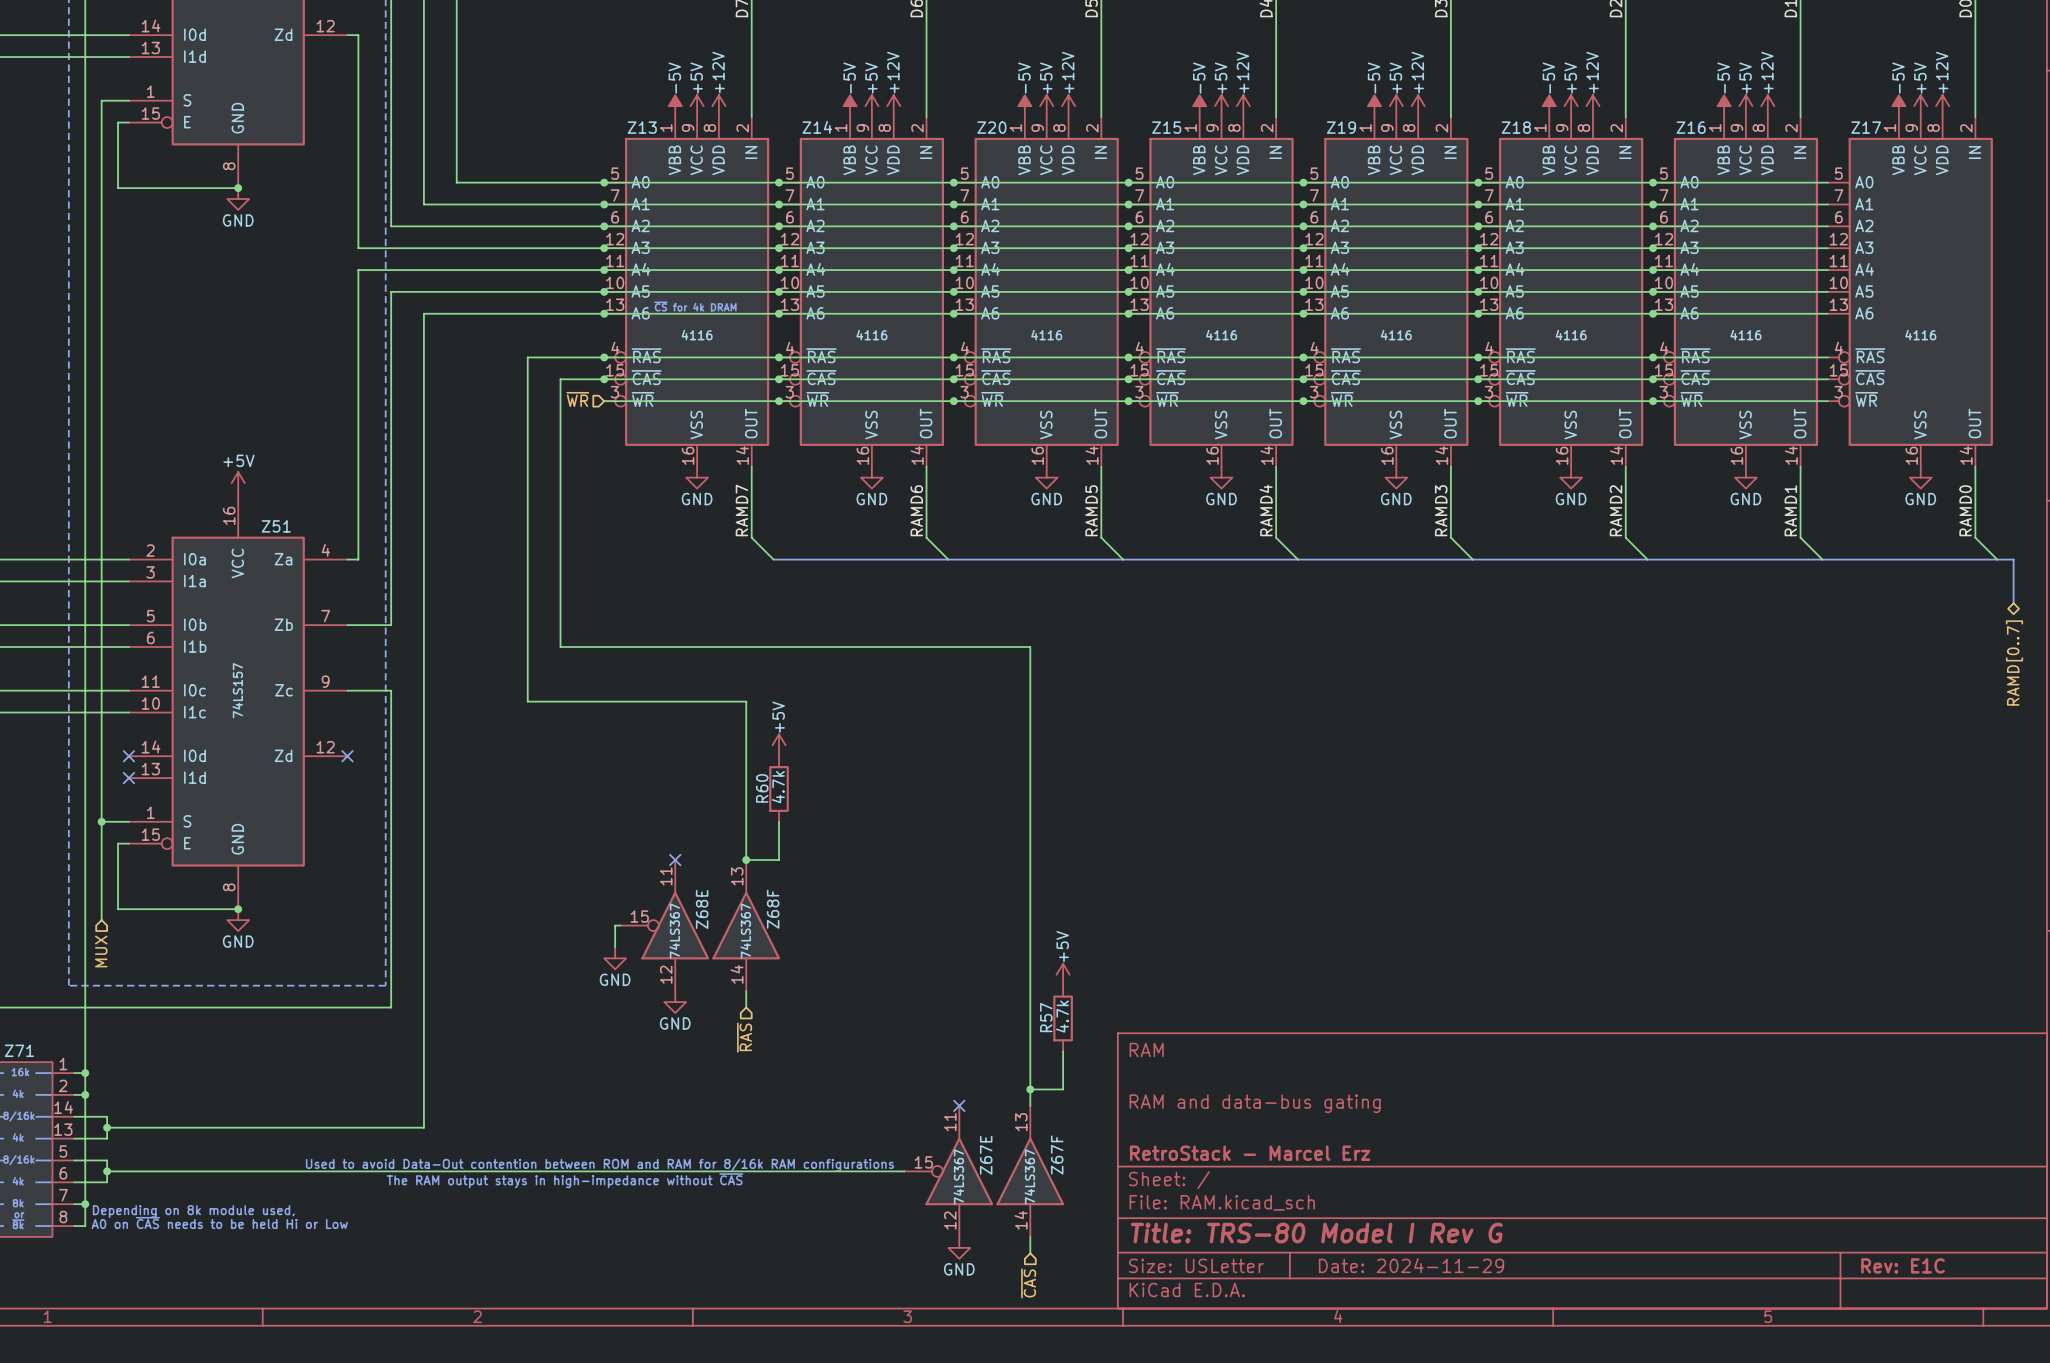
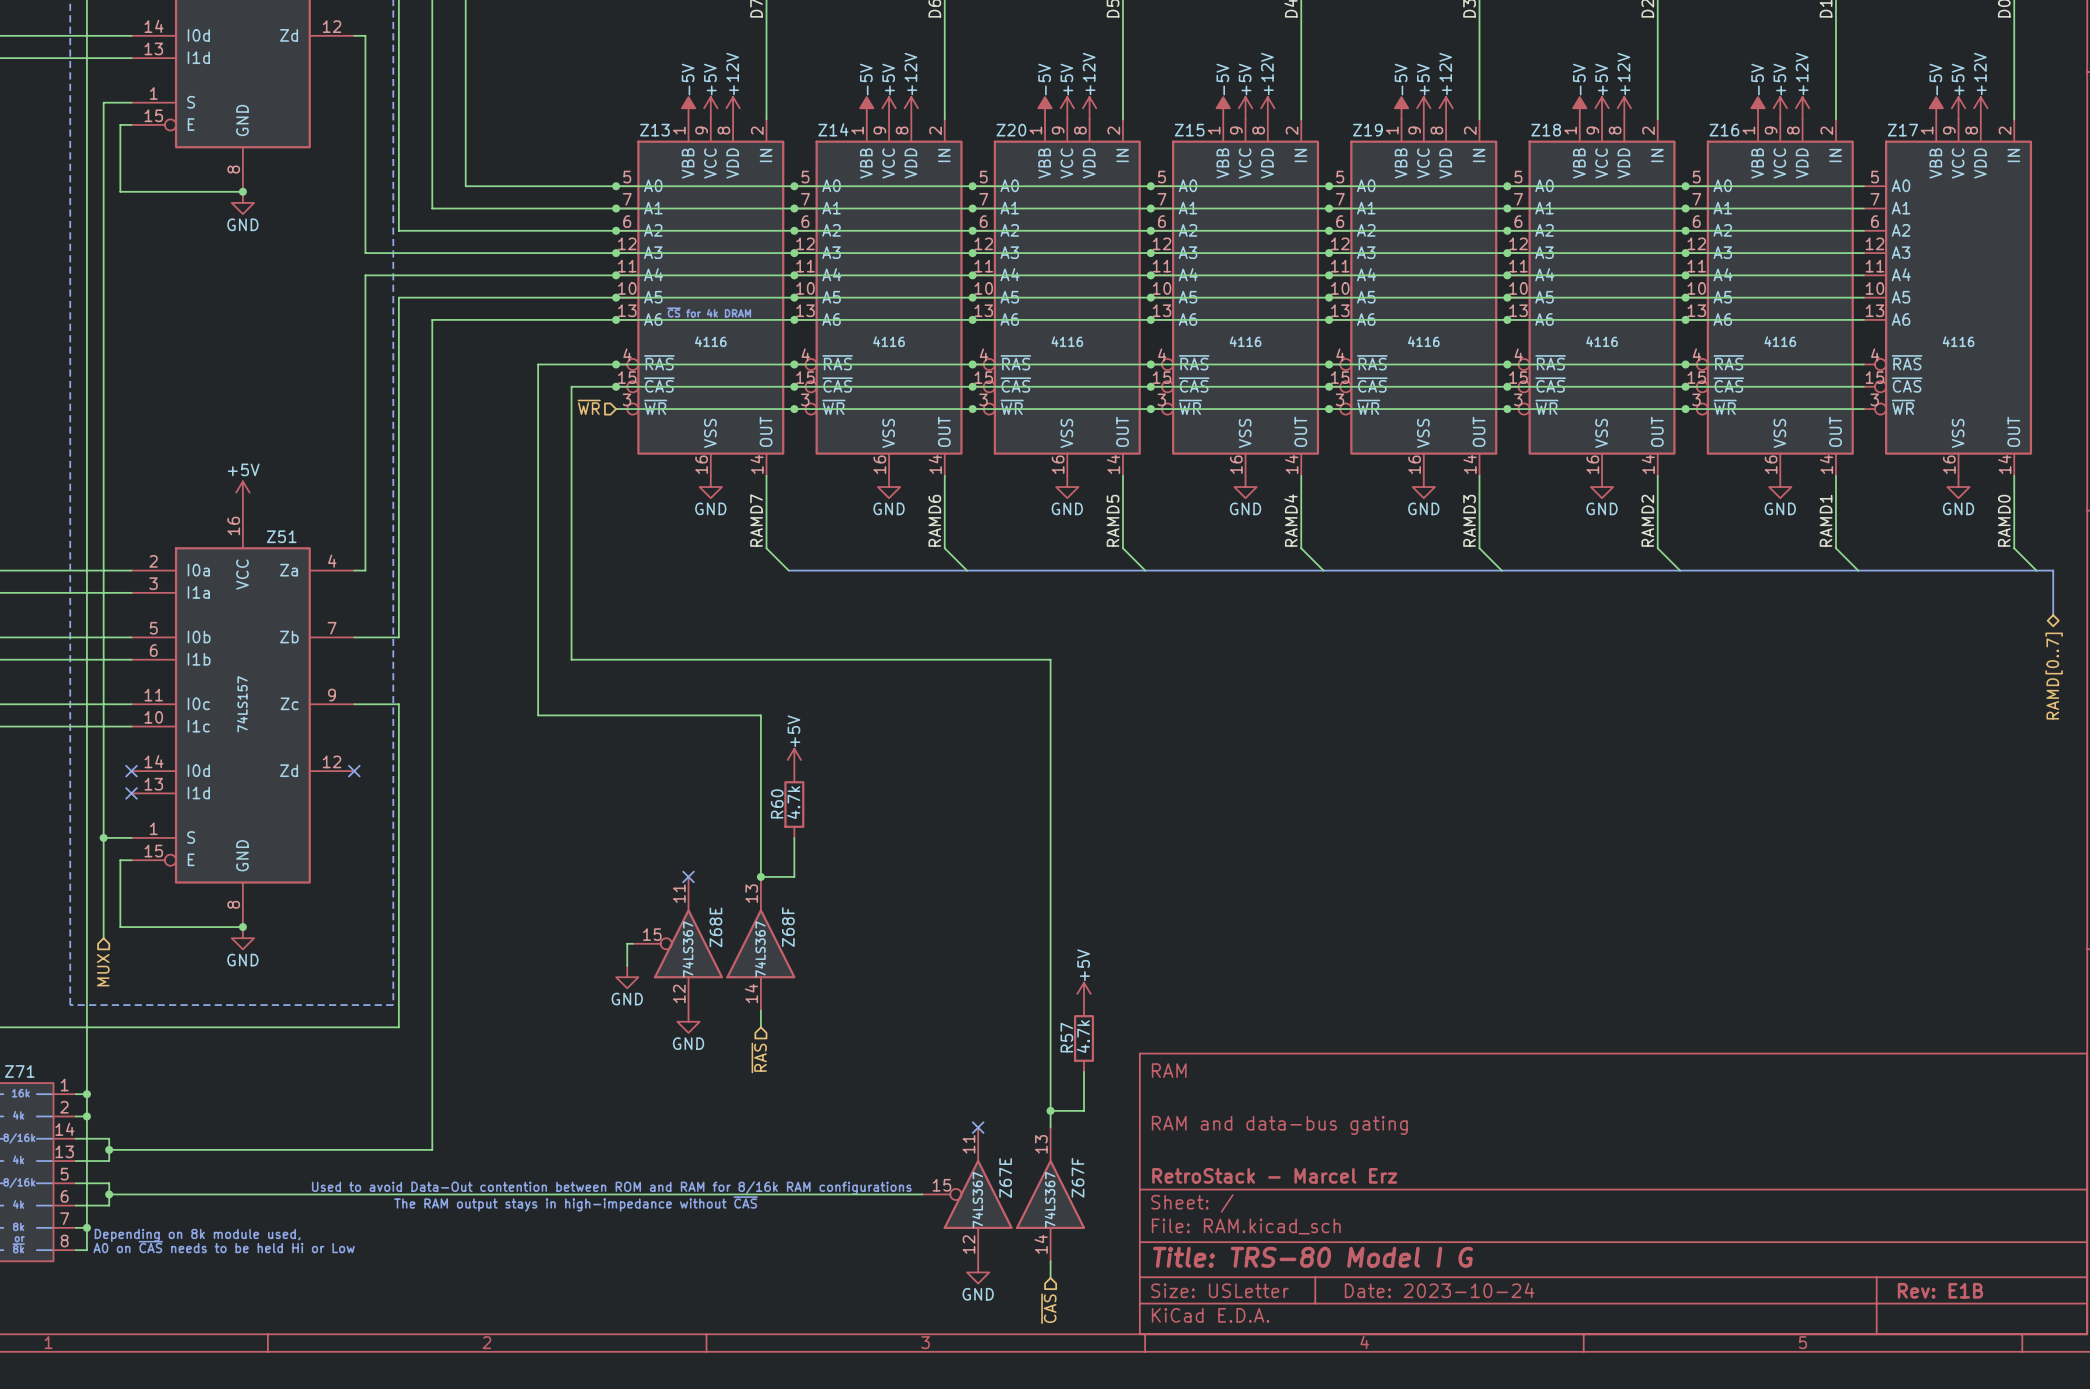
title block: Title: TRS-80 Model I Rev G (1316, 1233) -> Title: TRS-80 Model I G (1313, 1257)
title block: Date: 2024-11-29 (1411, 1265) -> Date: 2023-10-24 (1439, 1290)
title block: Rev: E1C (1903, 1265) -> Rev: E1B (1940, 1290)

